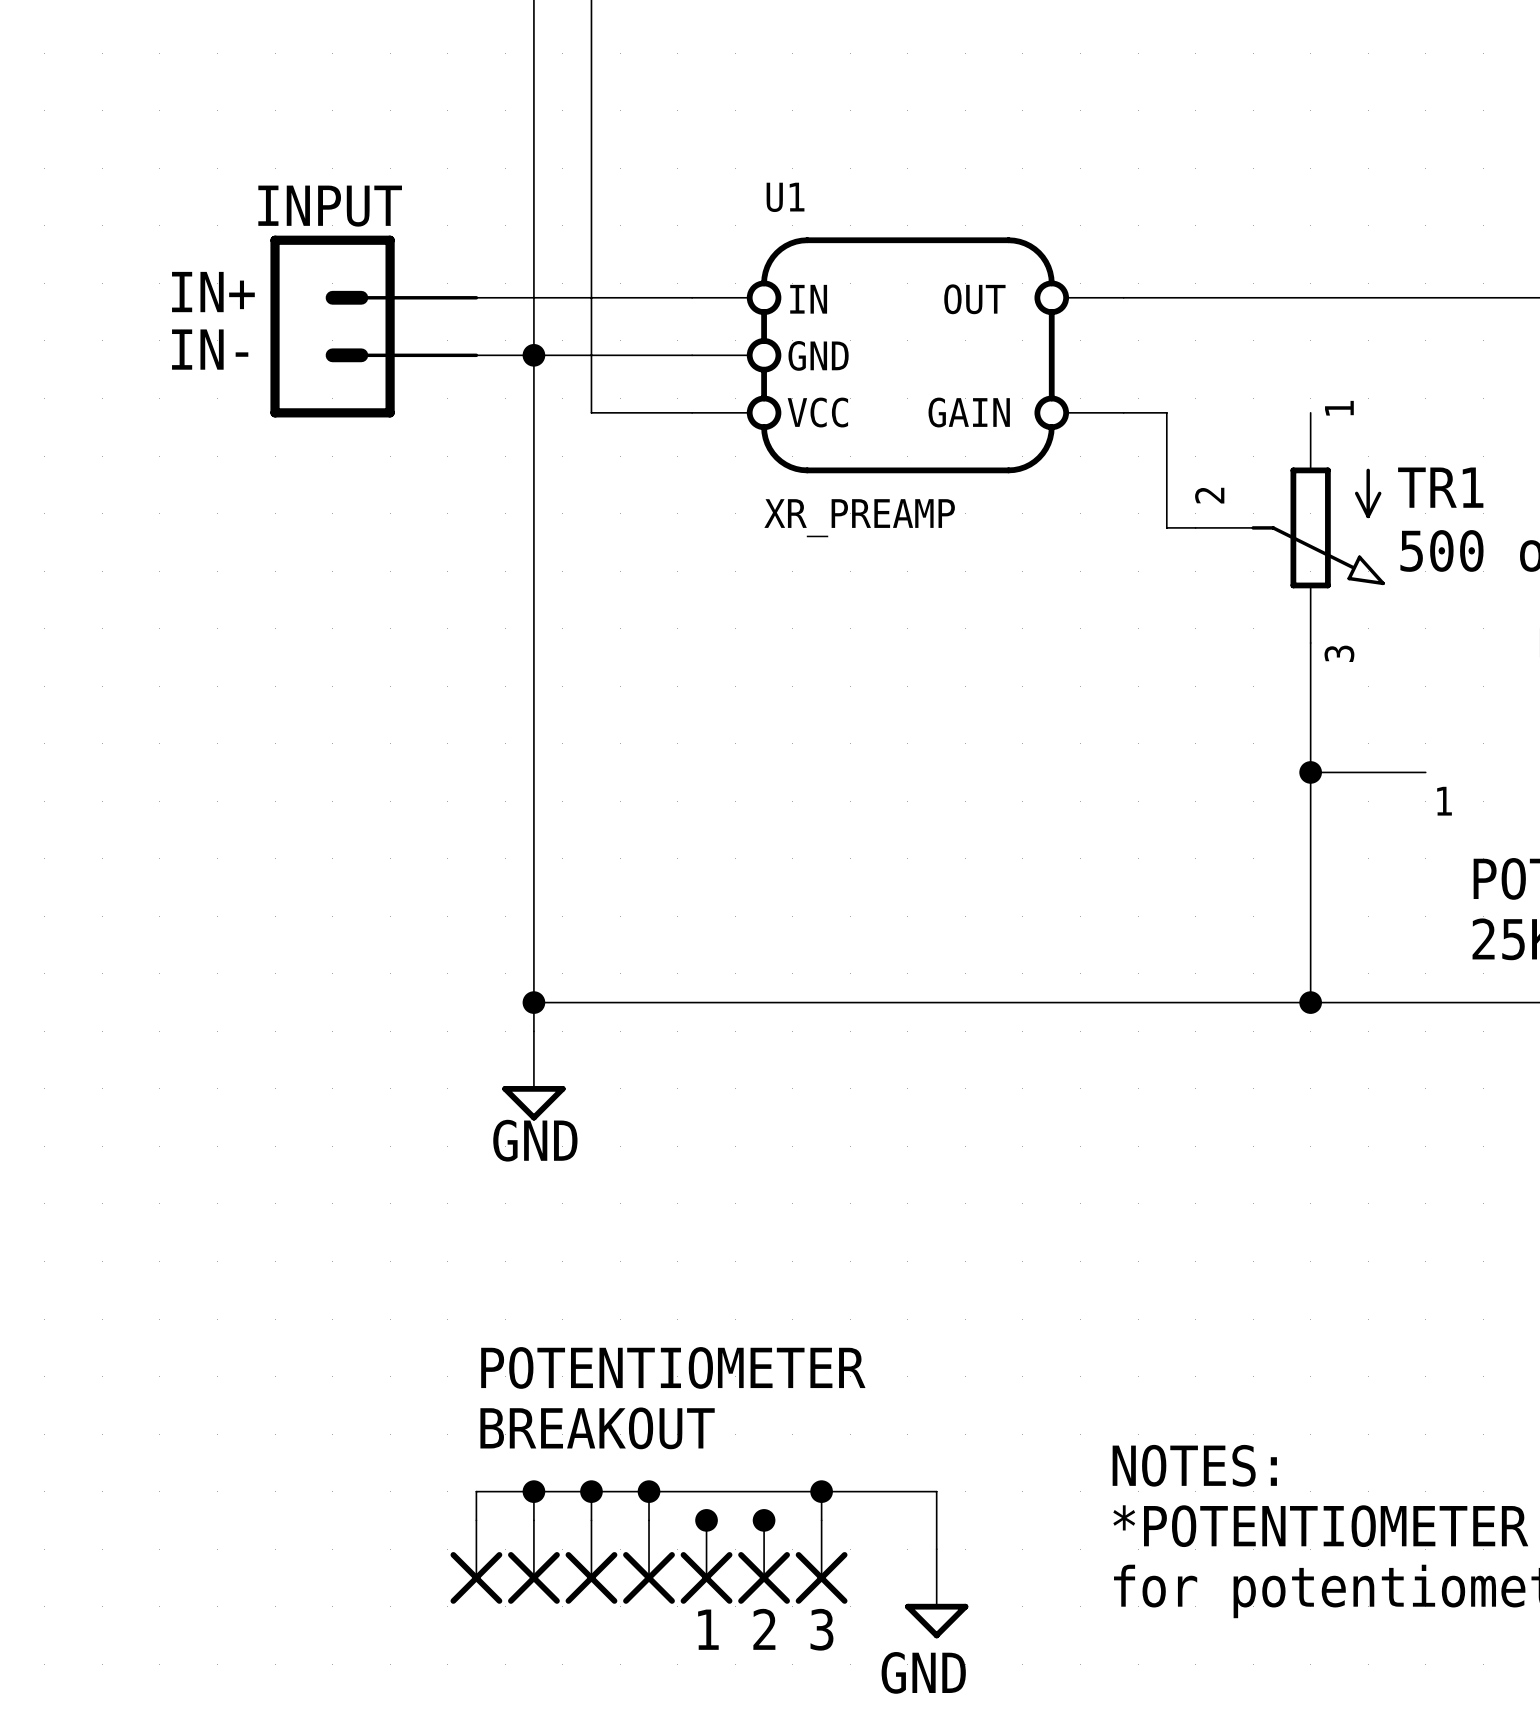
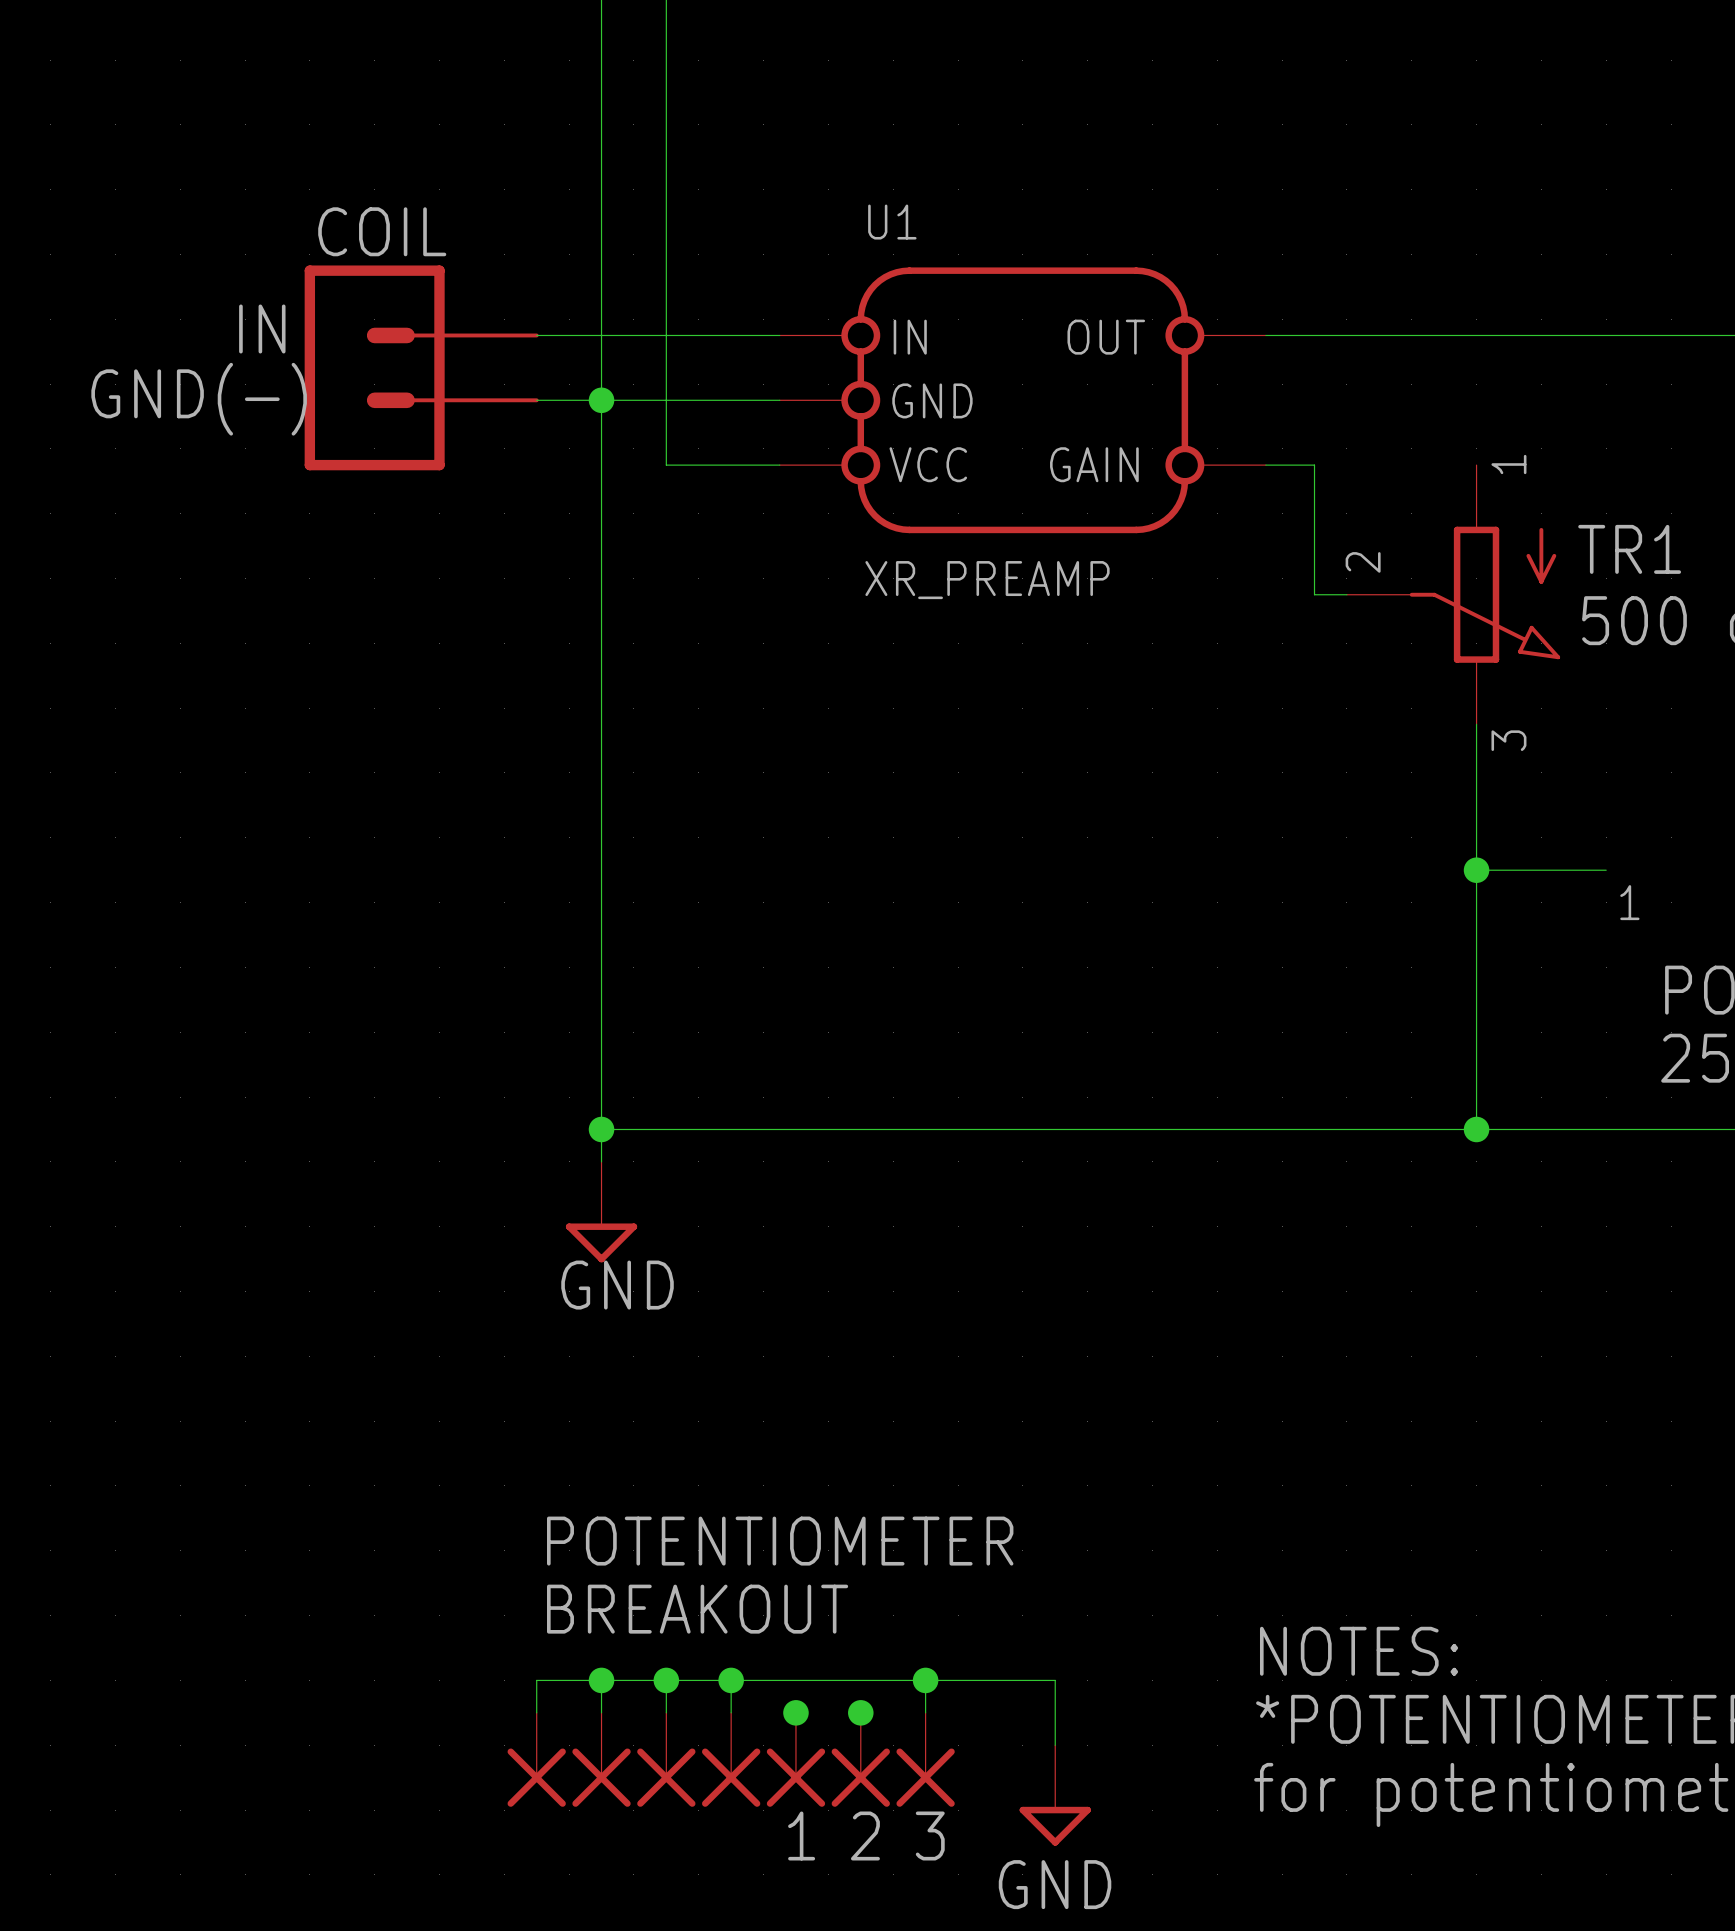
text: INPUT (330, 206) -> COIL (382, 231)
text: IN+ (213, 292) -> none
text: none -> IN (262, 328)
text: IN- (210, 349) -> none
text: none -> GND(-) (199, 399)

